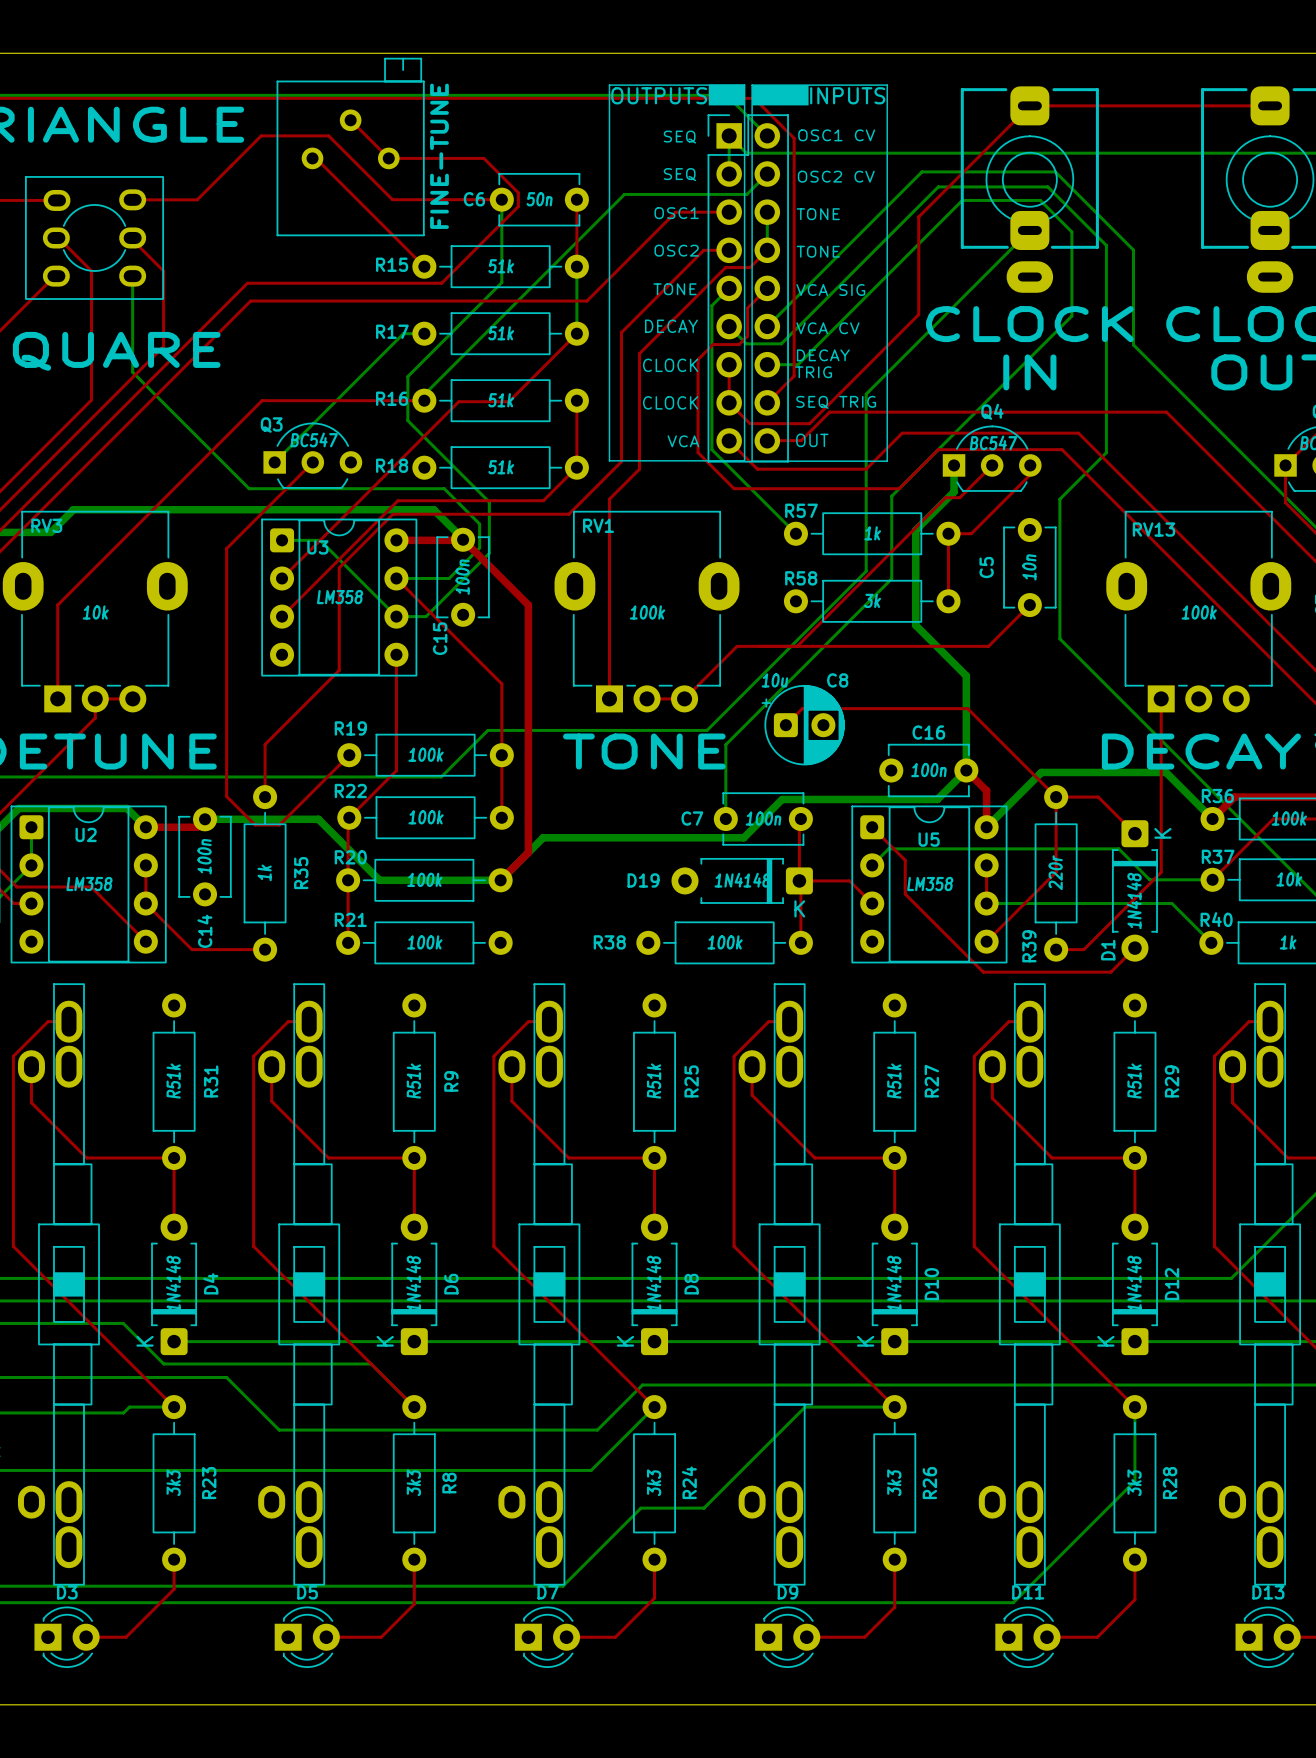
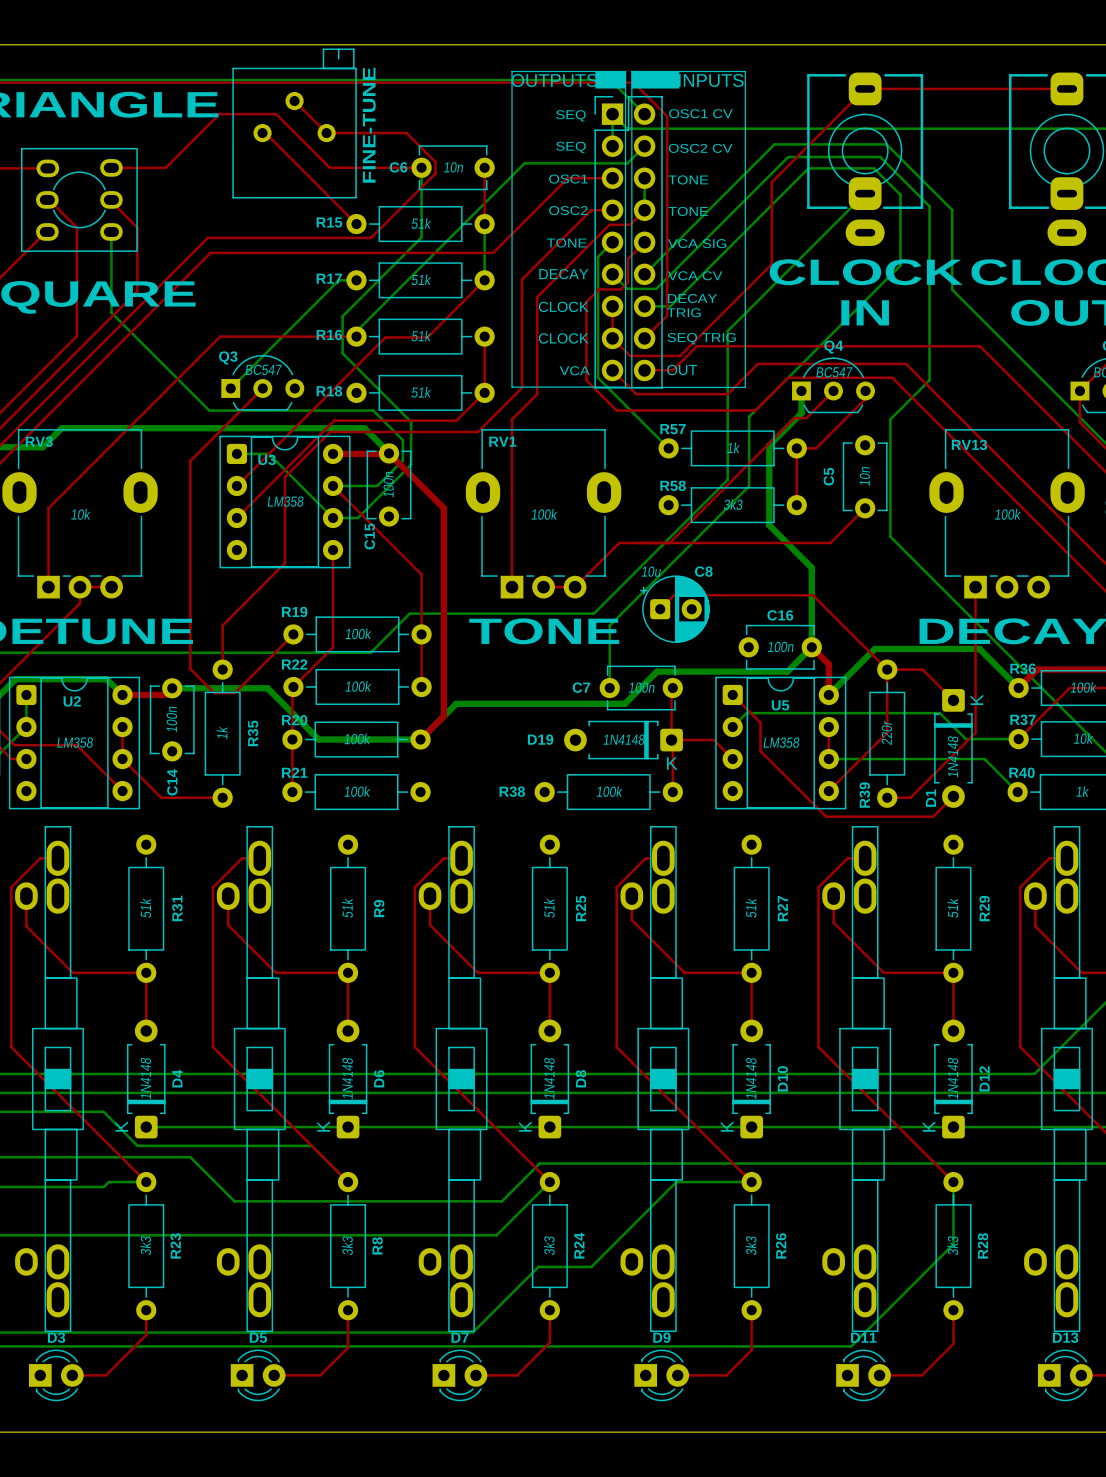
C6 value: 50n (539, 199) -> 10n (453, 167)
R58 value: 3k (872, 600) -> 3k3 (733, 504)
R31 value: R51k (173, 1081) -> 51k (145, 907)
R9 value: R51k (413, 1081) -> 51k (347, 907)
R25 value: R51k (654, 1081) -> 51k (549, 907)
R27 value: R51k (894, 1081) -> 51k (751, 907)
R29 value: R51k (1134, 1081) -> 51k (952, 907)

